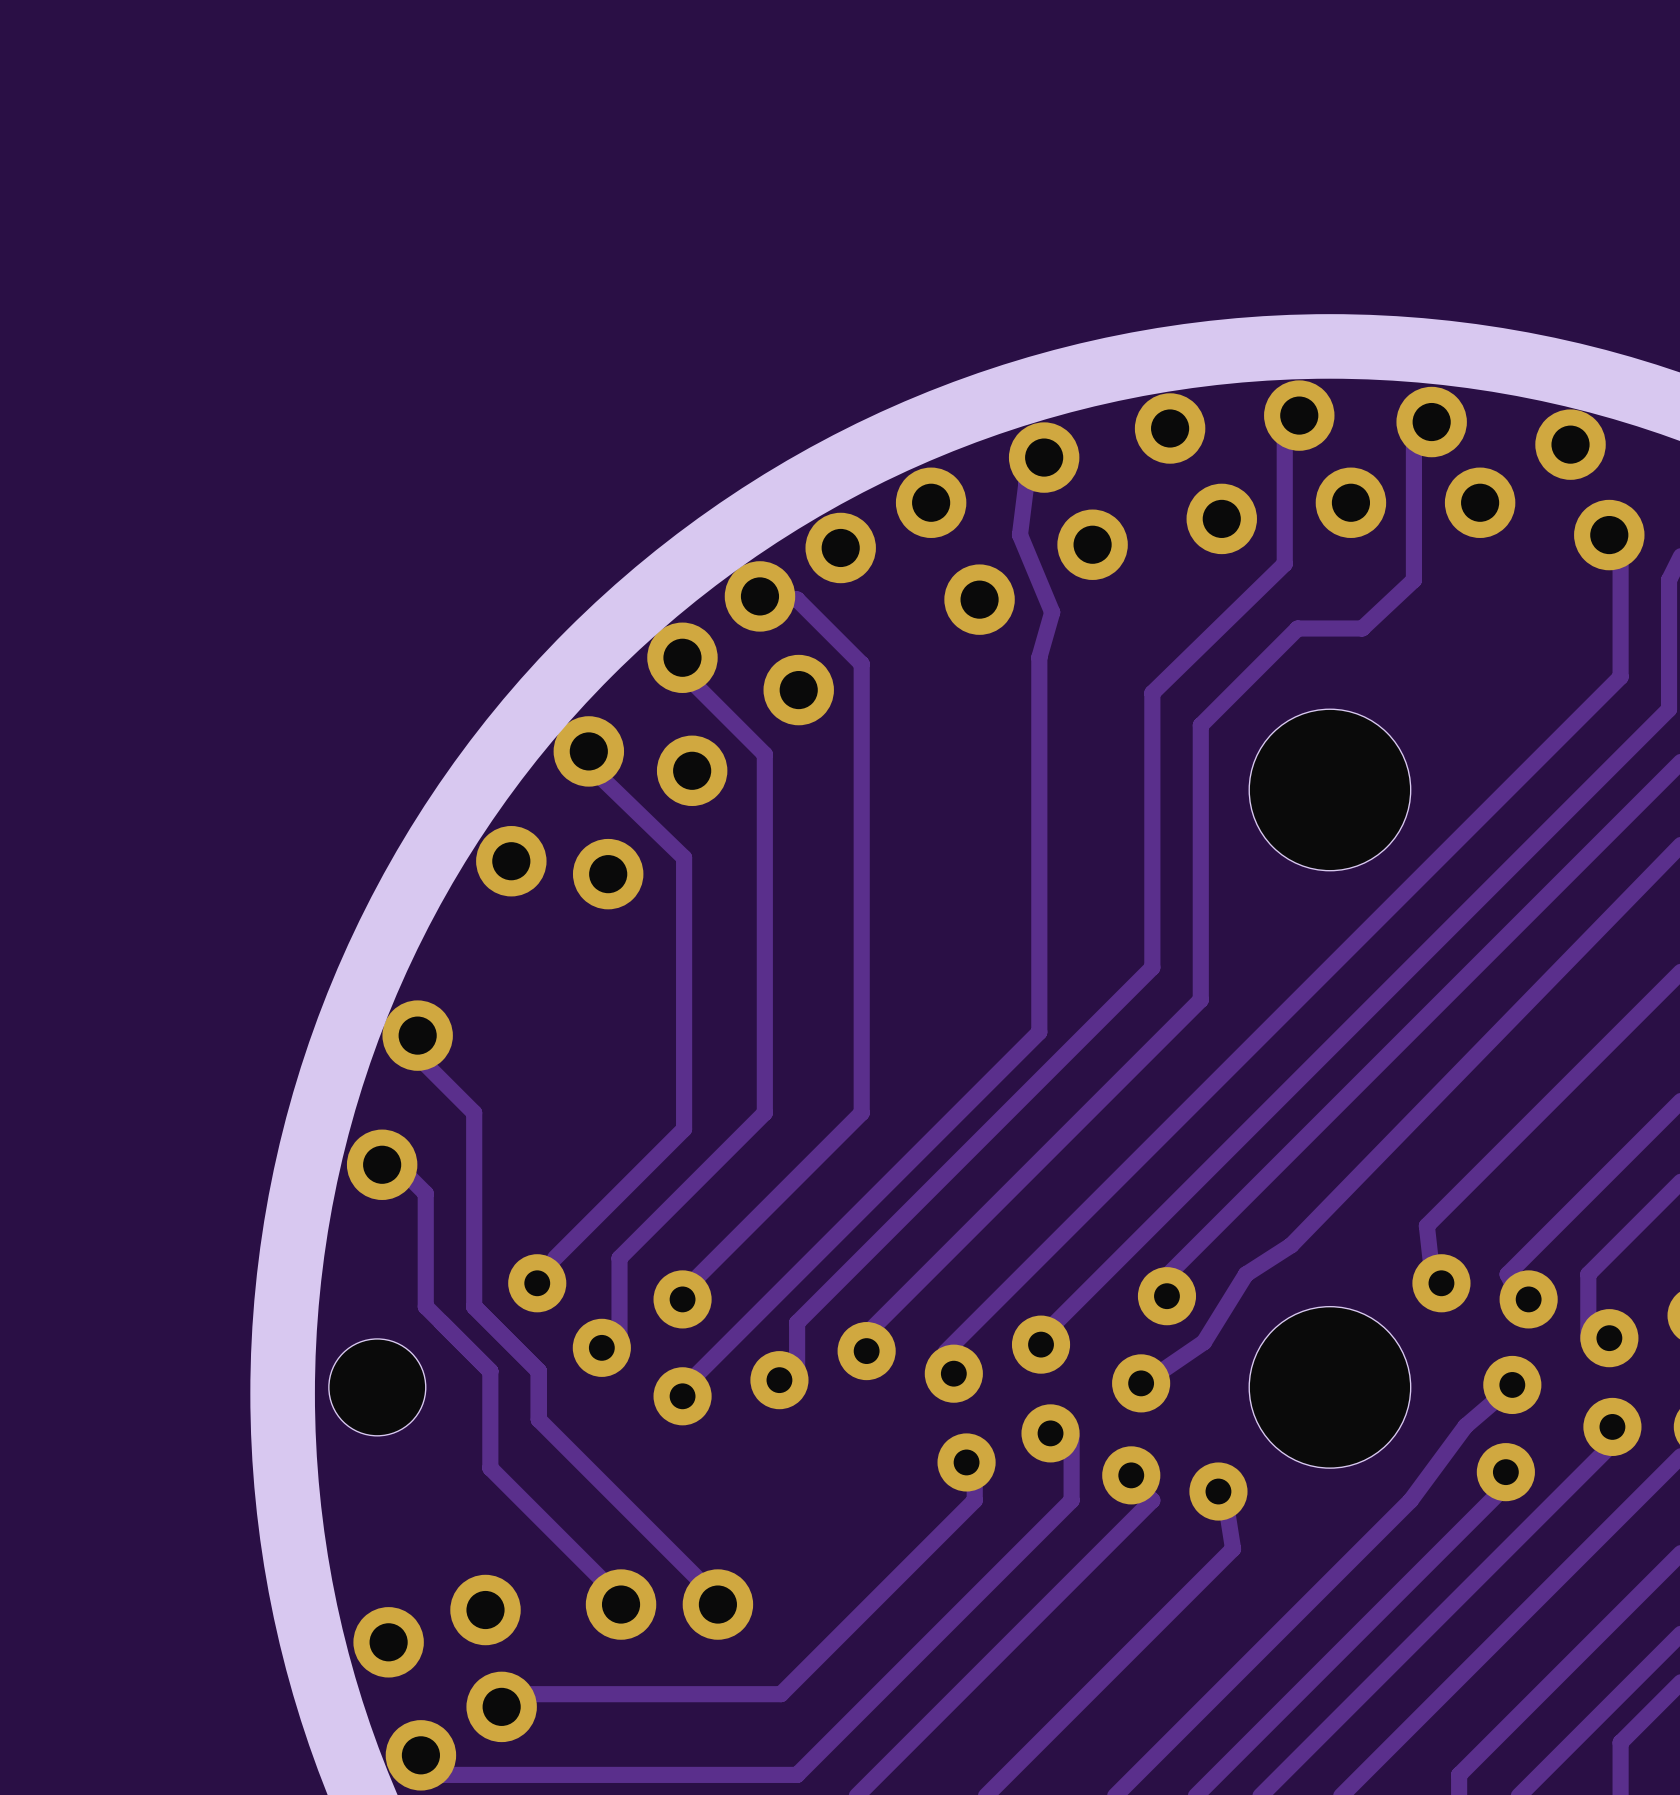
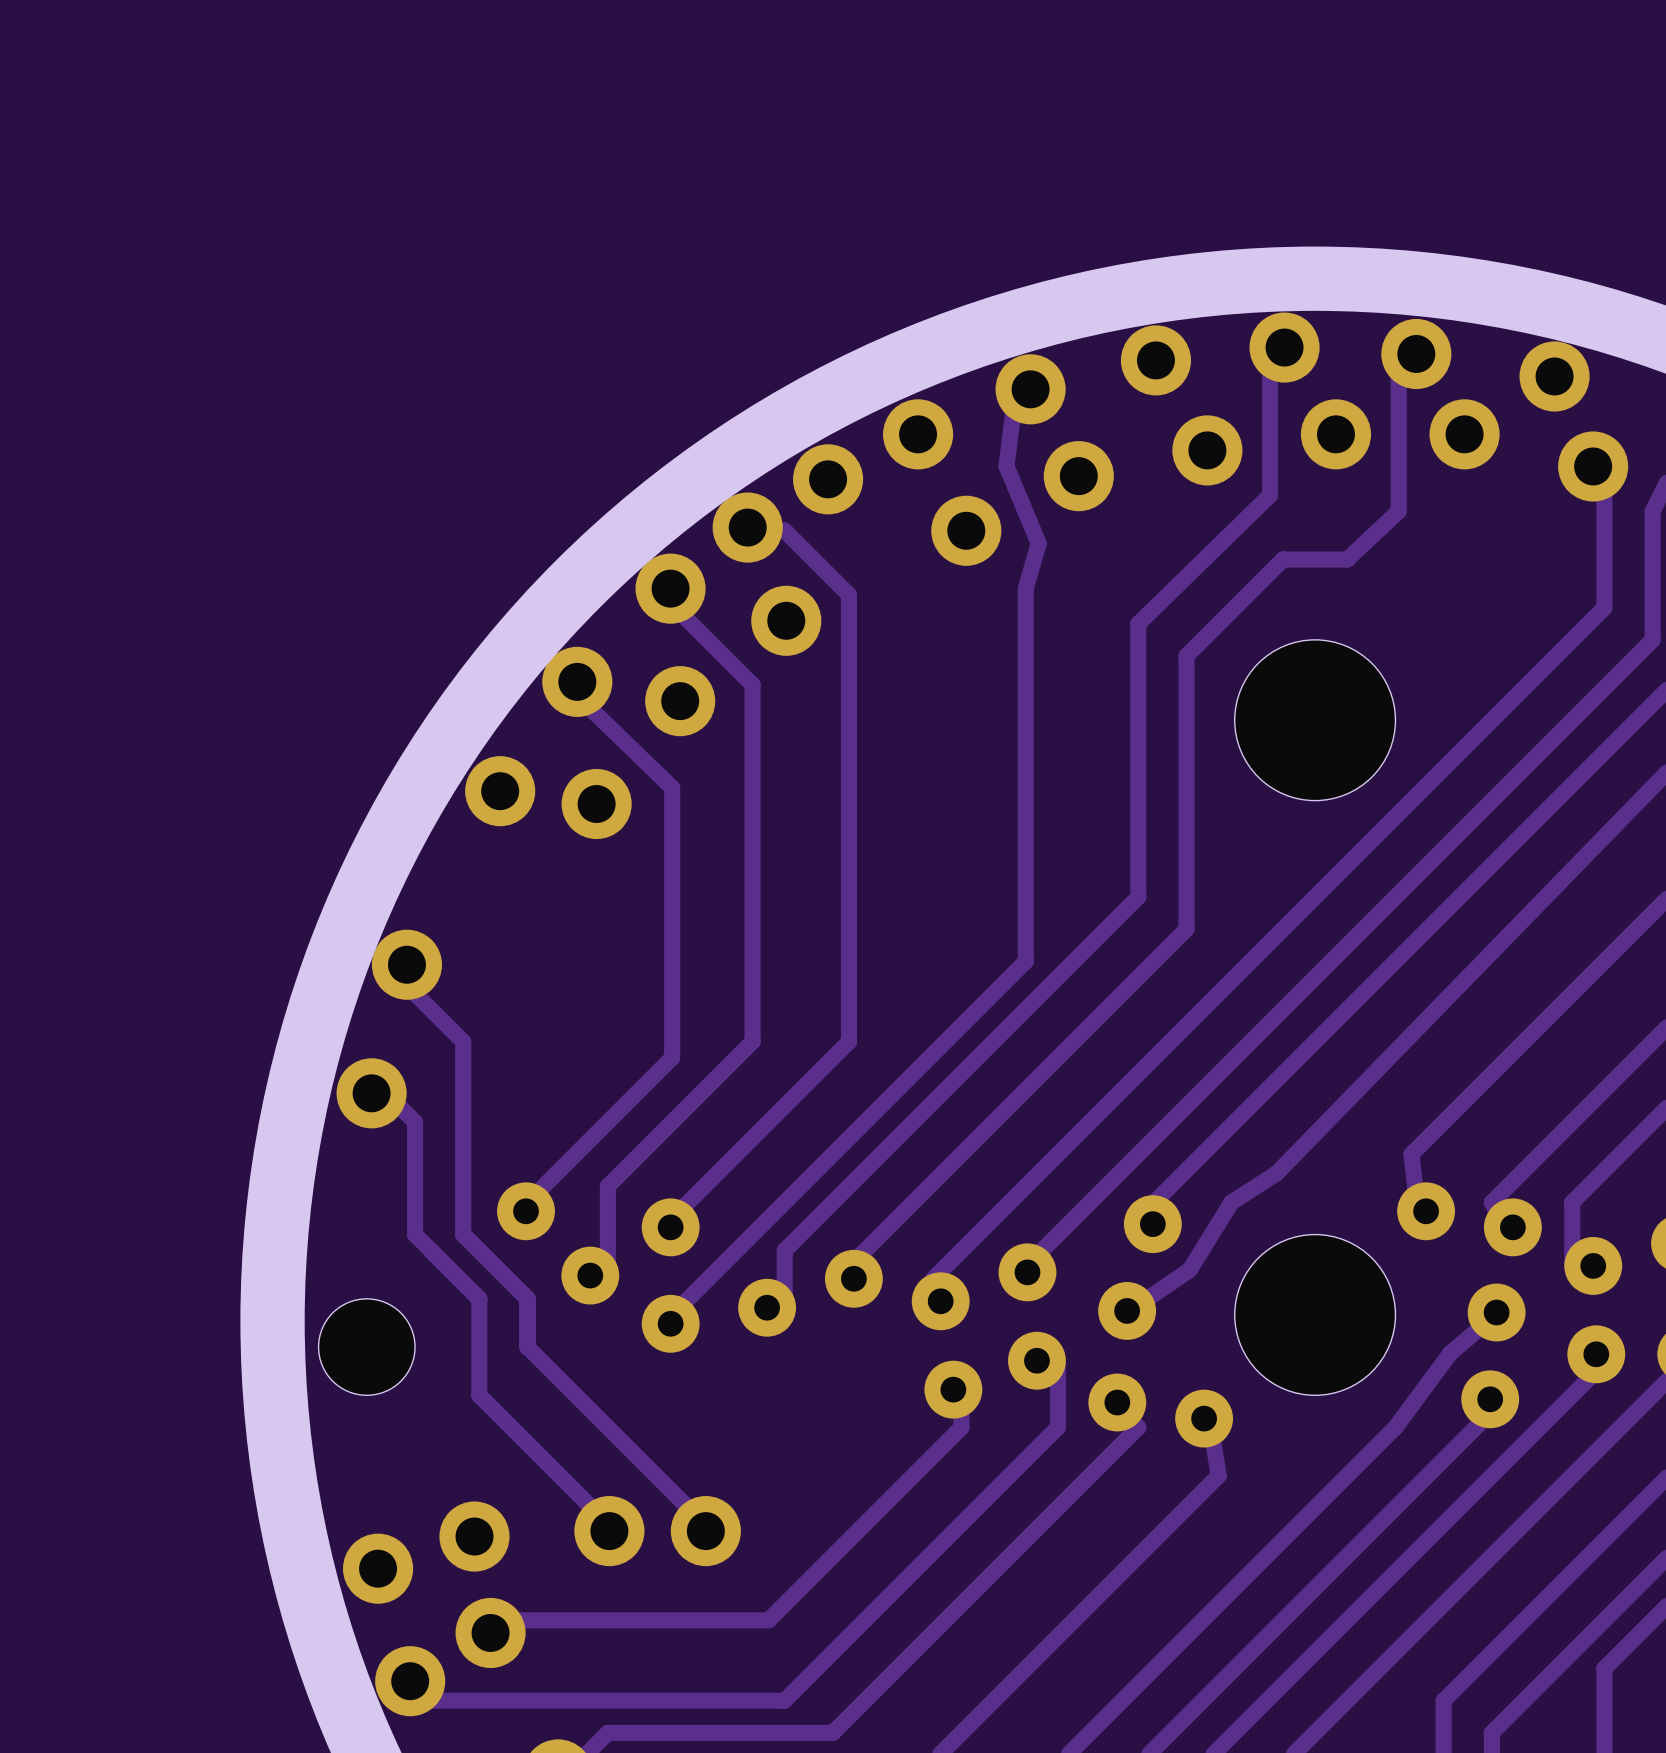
hole position: (377, 1387) -> (366, 1347)

